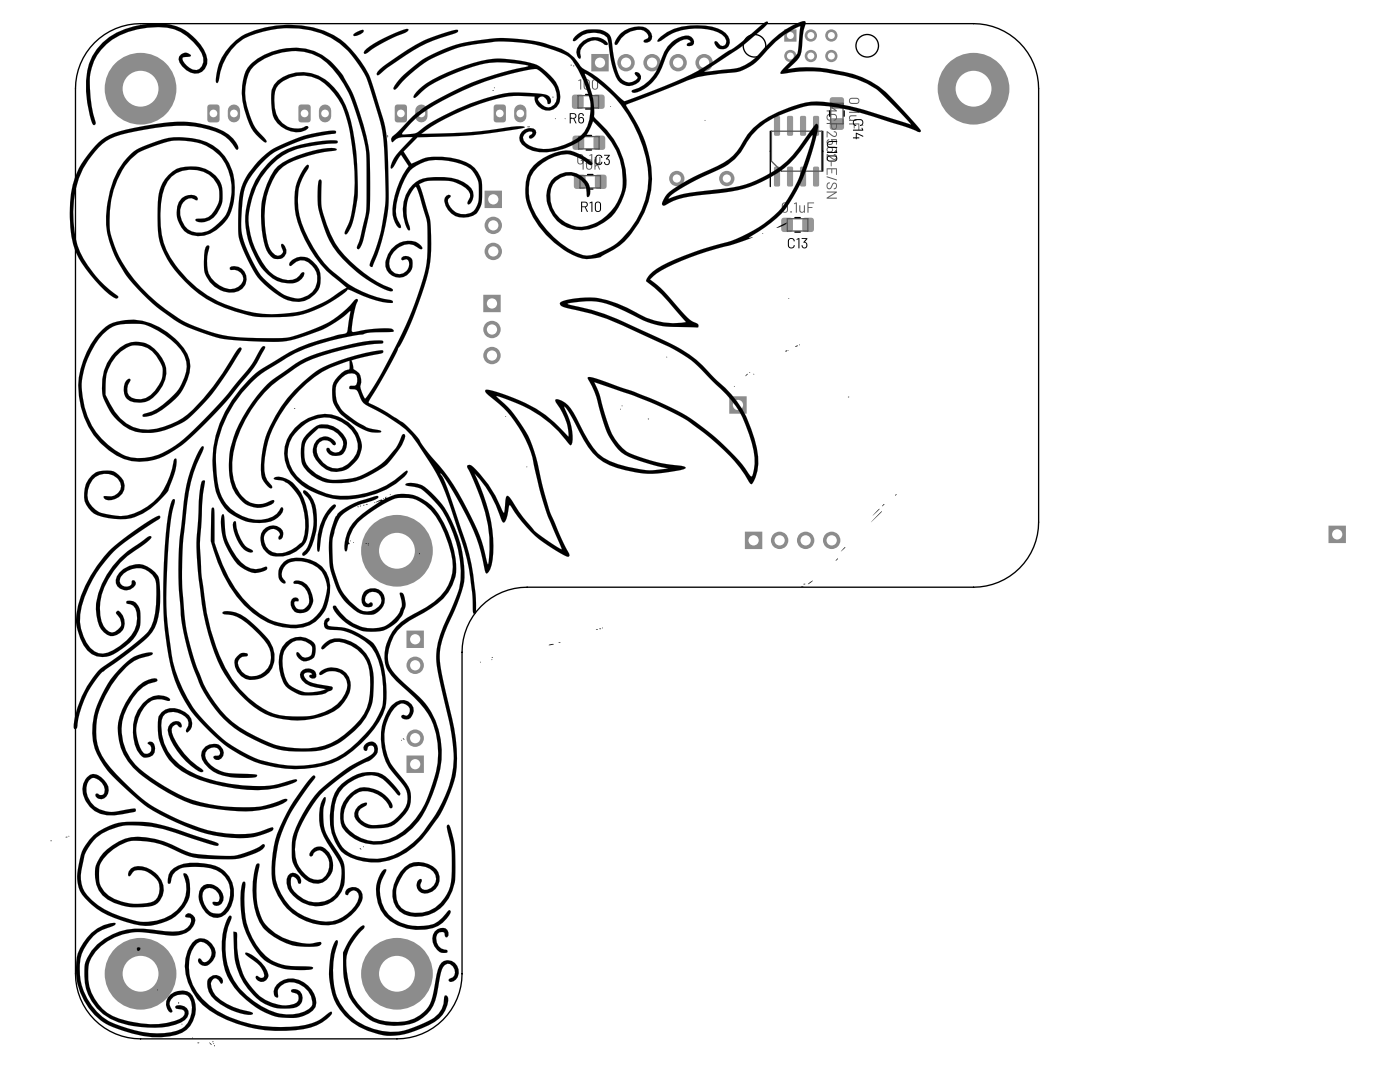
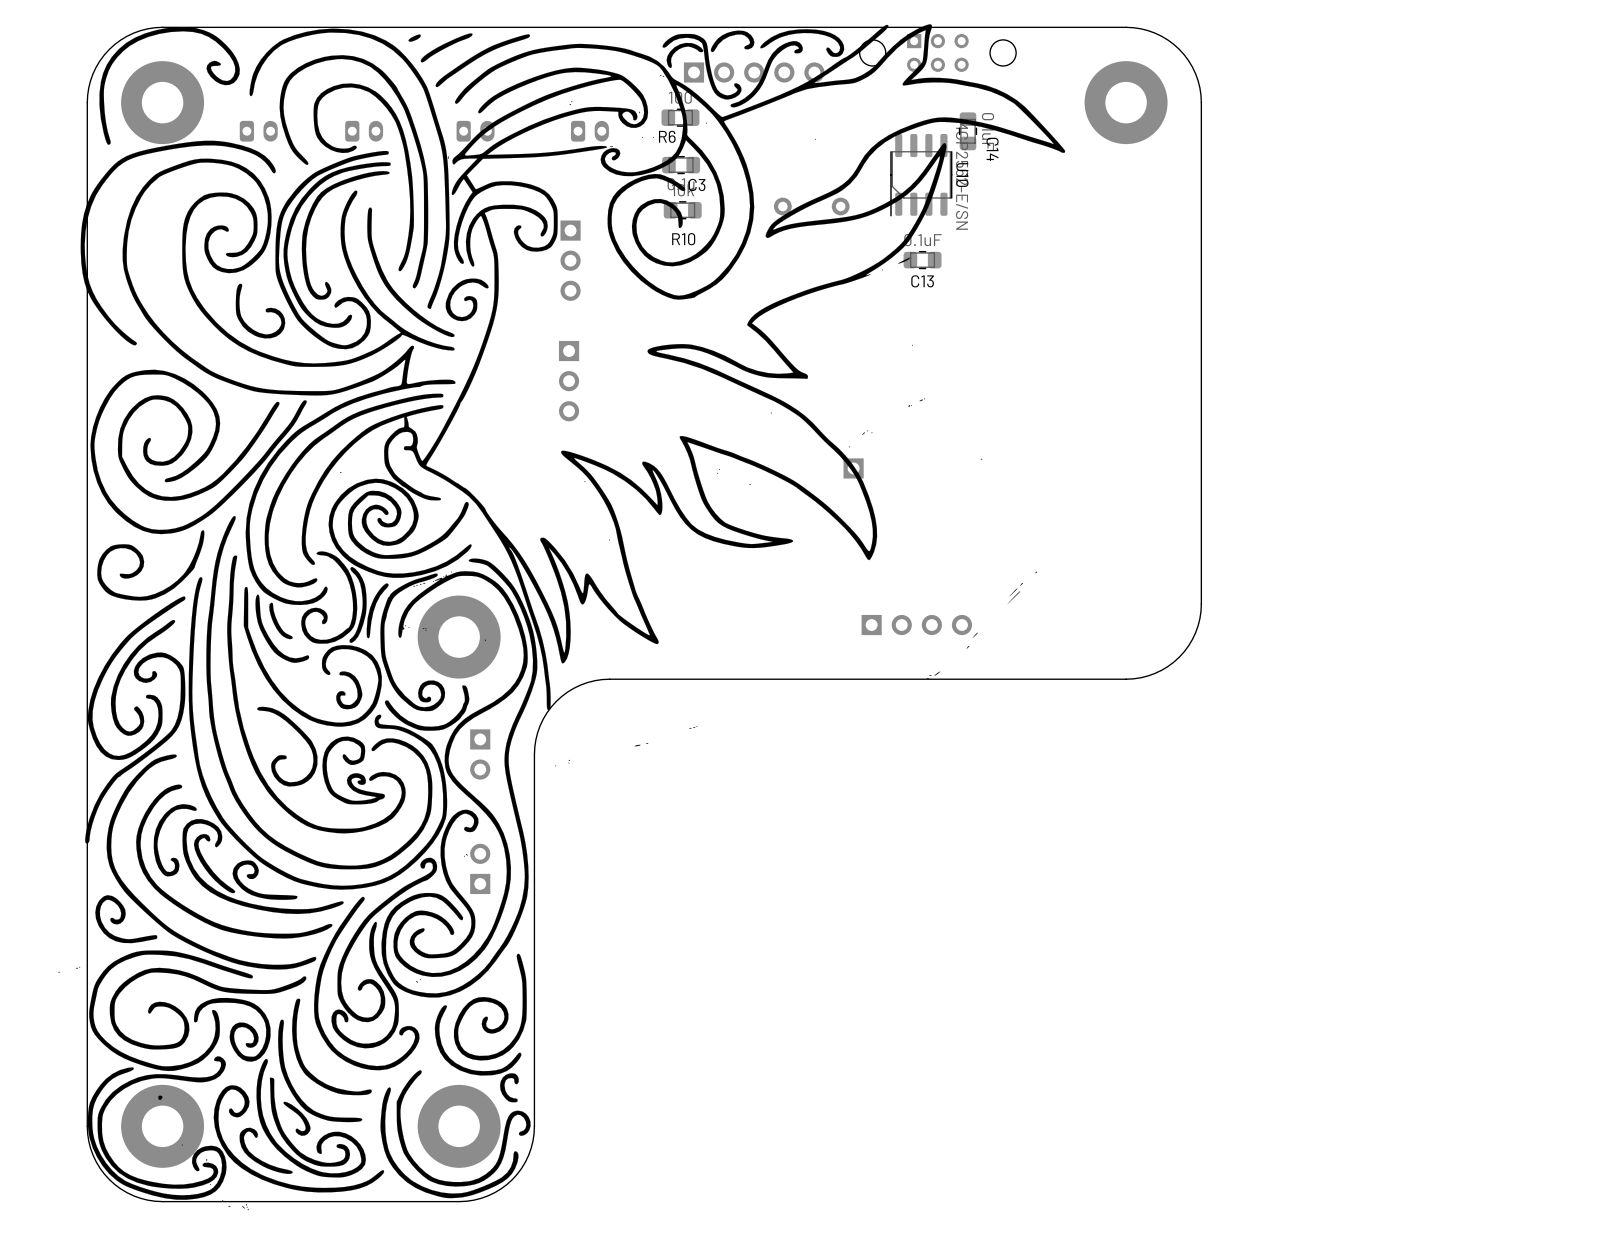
part: (1337, 534) -> none

